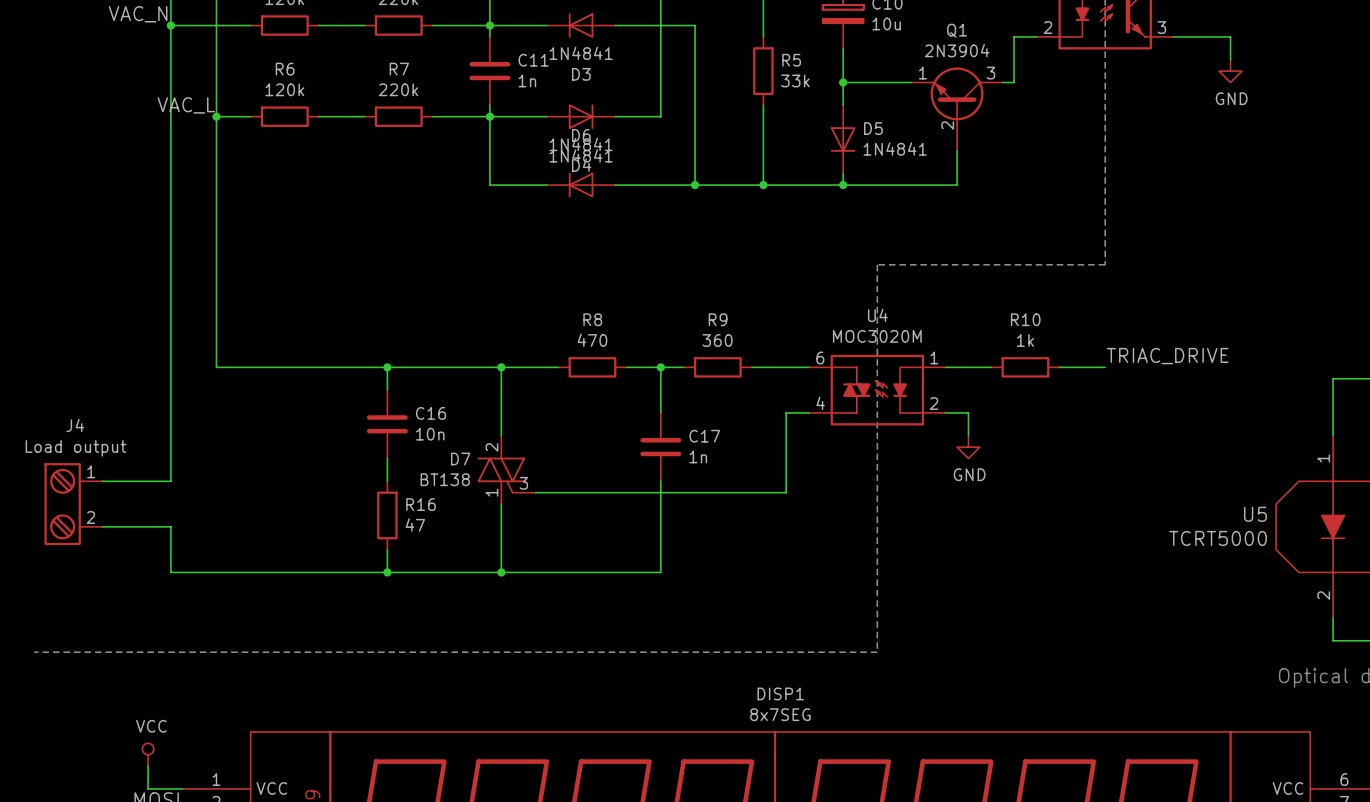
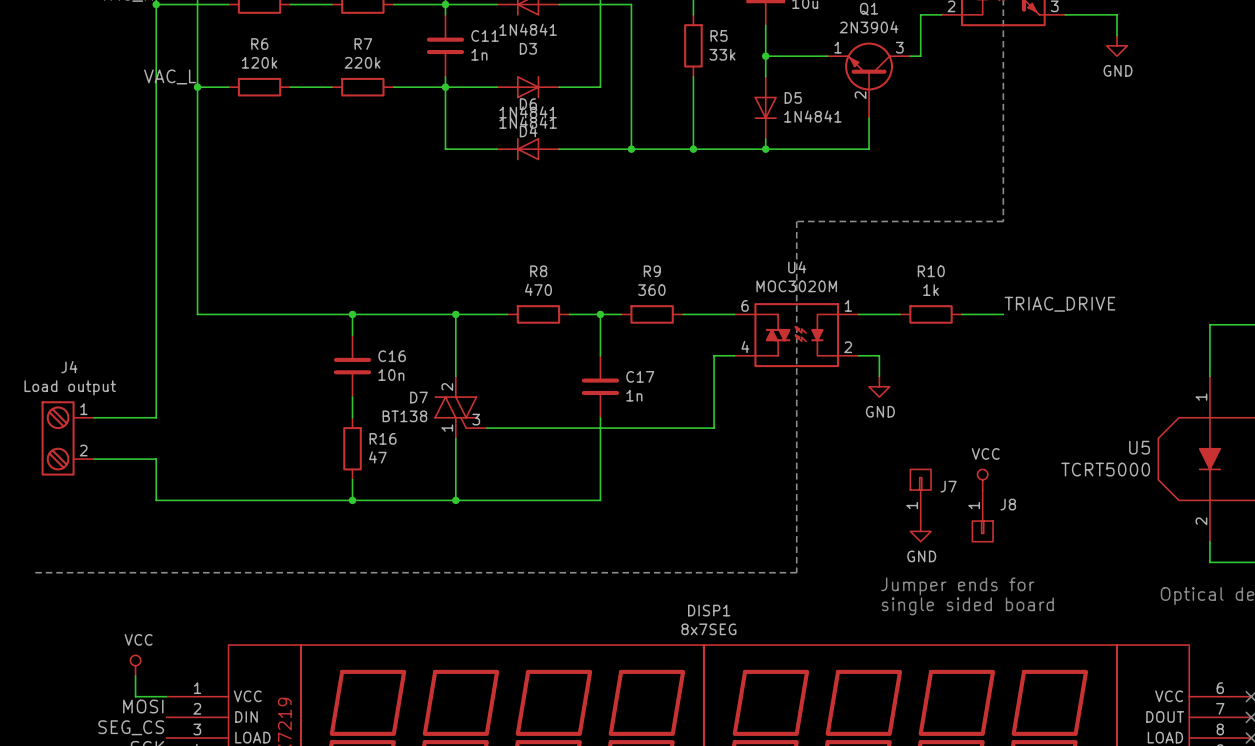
power symbol: none -> VCC (982, 479)
J7: none -> (920, 495)
J8: none -> (982, 515)
power symbol: none -> GND (920, 531)
text: none -> Jumper ends for (957, 586)
text: none -> single sided board (967, 606)

